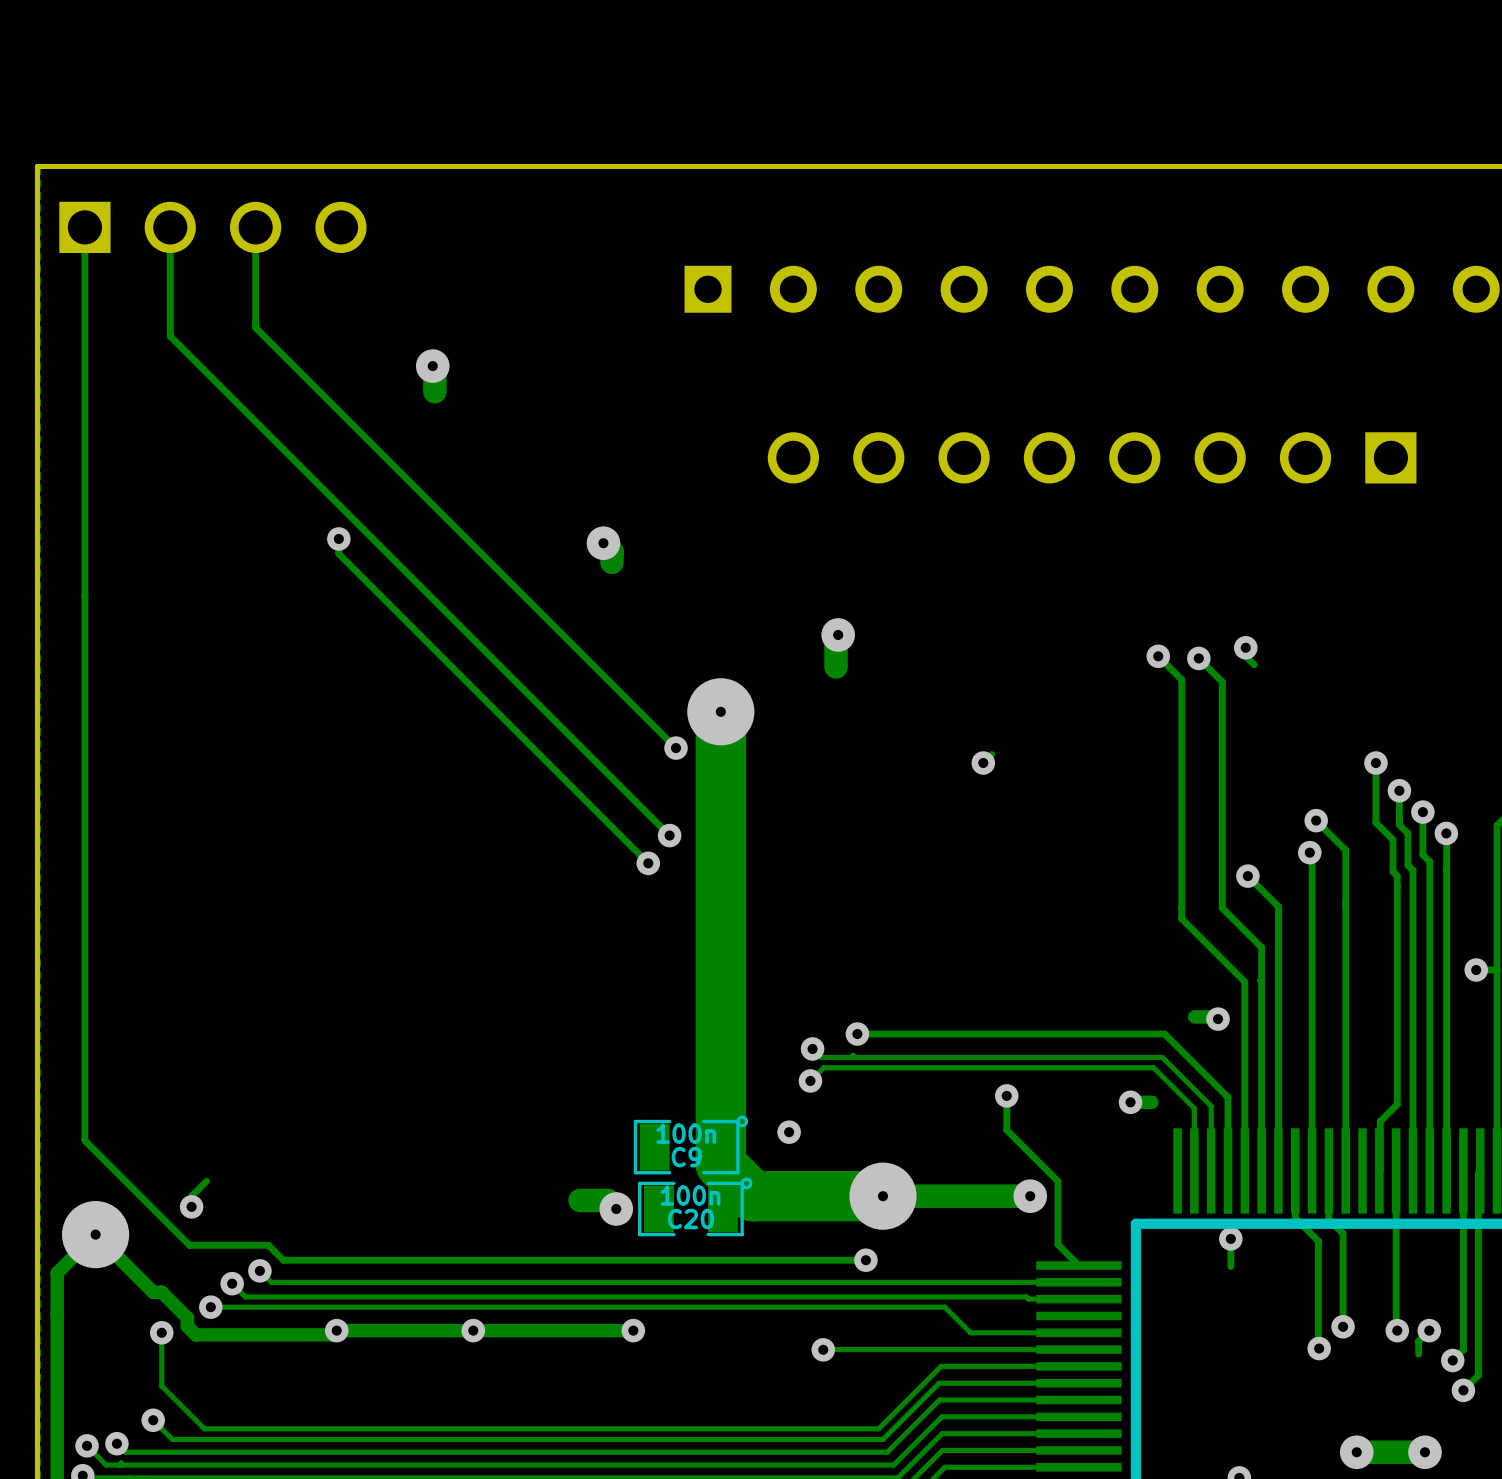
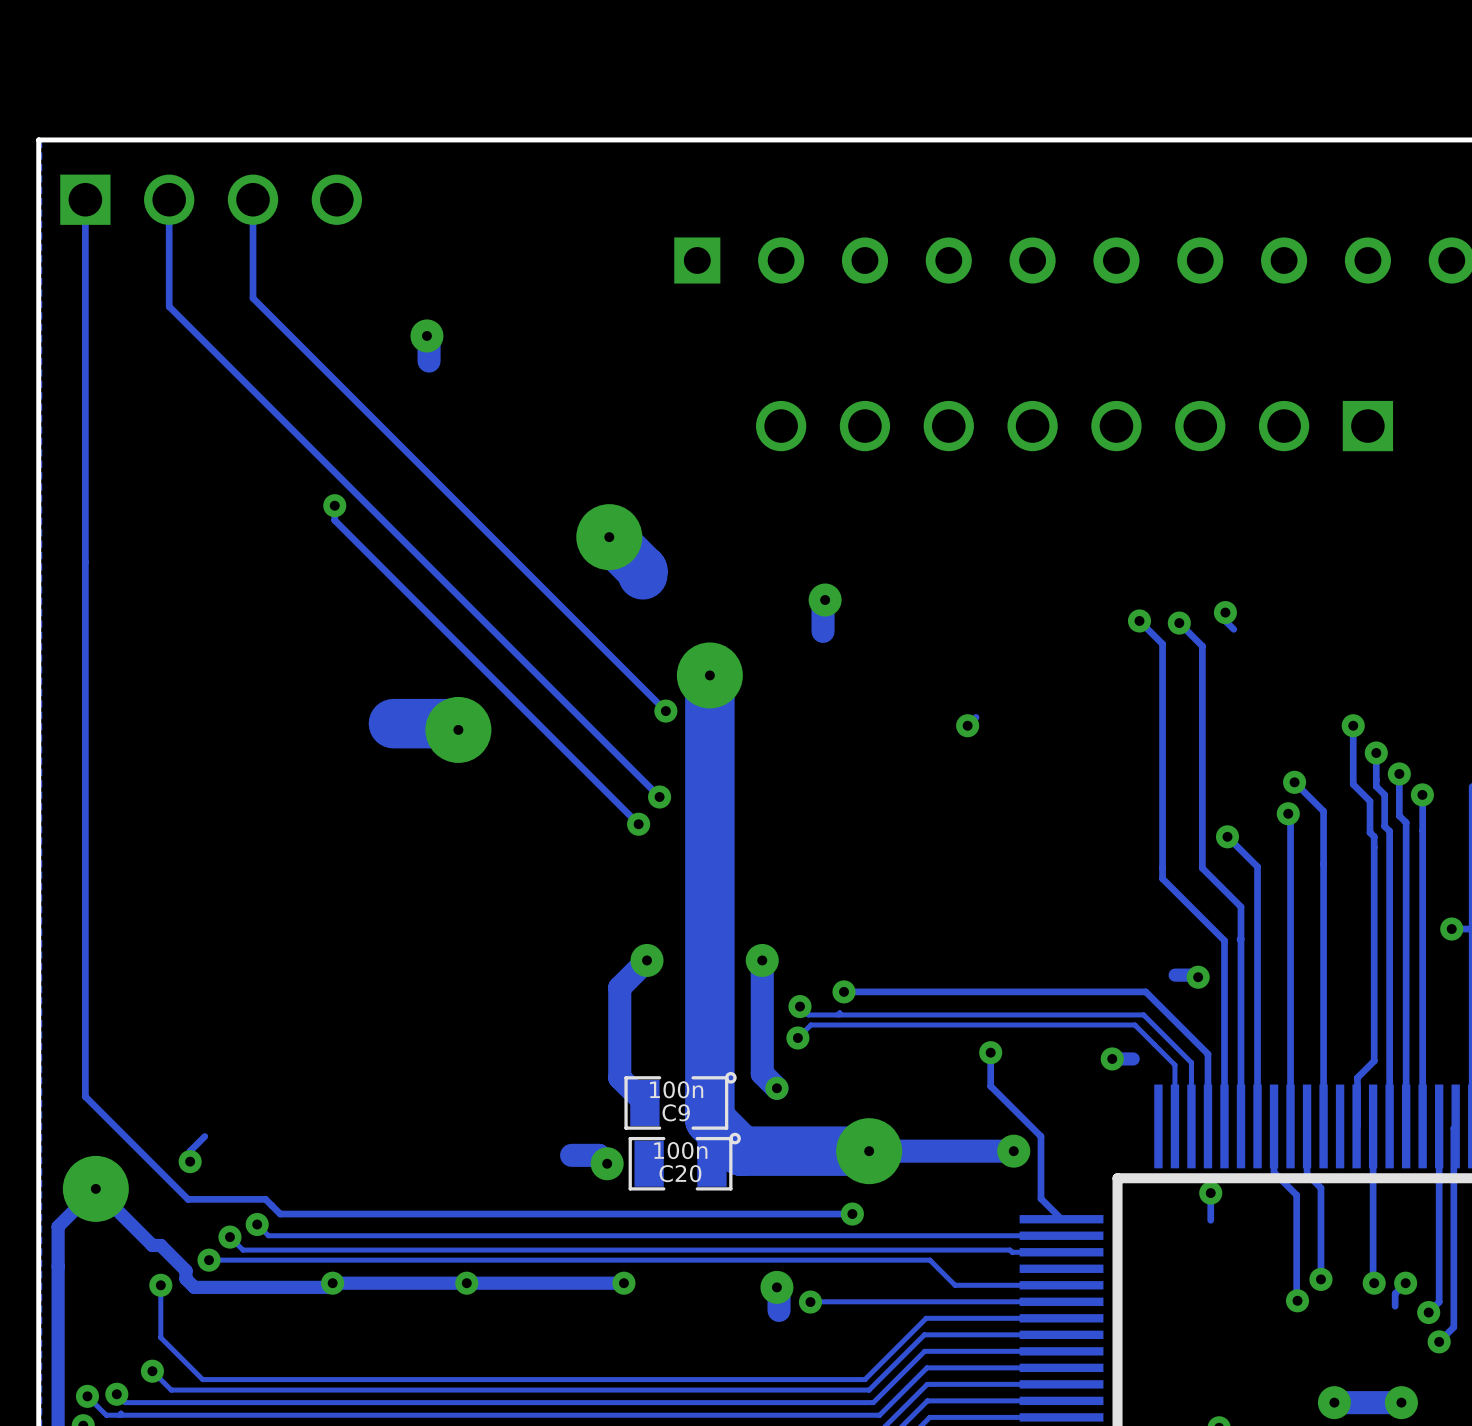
via size: [586, 526, 621, 561] -> [576, 504, 643, 571]
track: (603, 543) (612, 551) (612, 562) -> none
track: none -> (609, 537) (642, 570) (642, 574)
track: none -> (393, 723) (452, 723) (458, 729)
via: none -> (458, 729)
track: none -> (647, 960) (619, 987) (619, 1077) (644, 1102)
via: none -> (647, 960)
track: none -> (762, 960) (762, 1073) (776, 1088)
via: none -> (762, 960)
track: none -> (776, 1287) (779, 1289) (779, 1310)
via: none -> (776, 1287)

